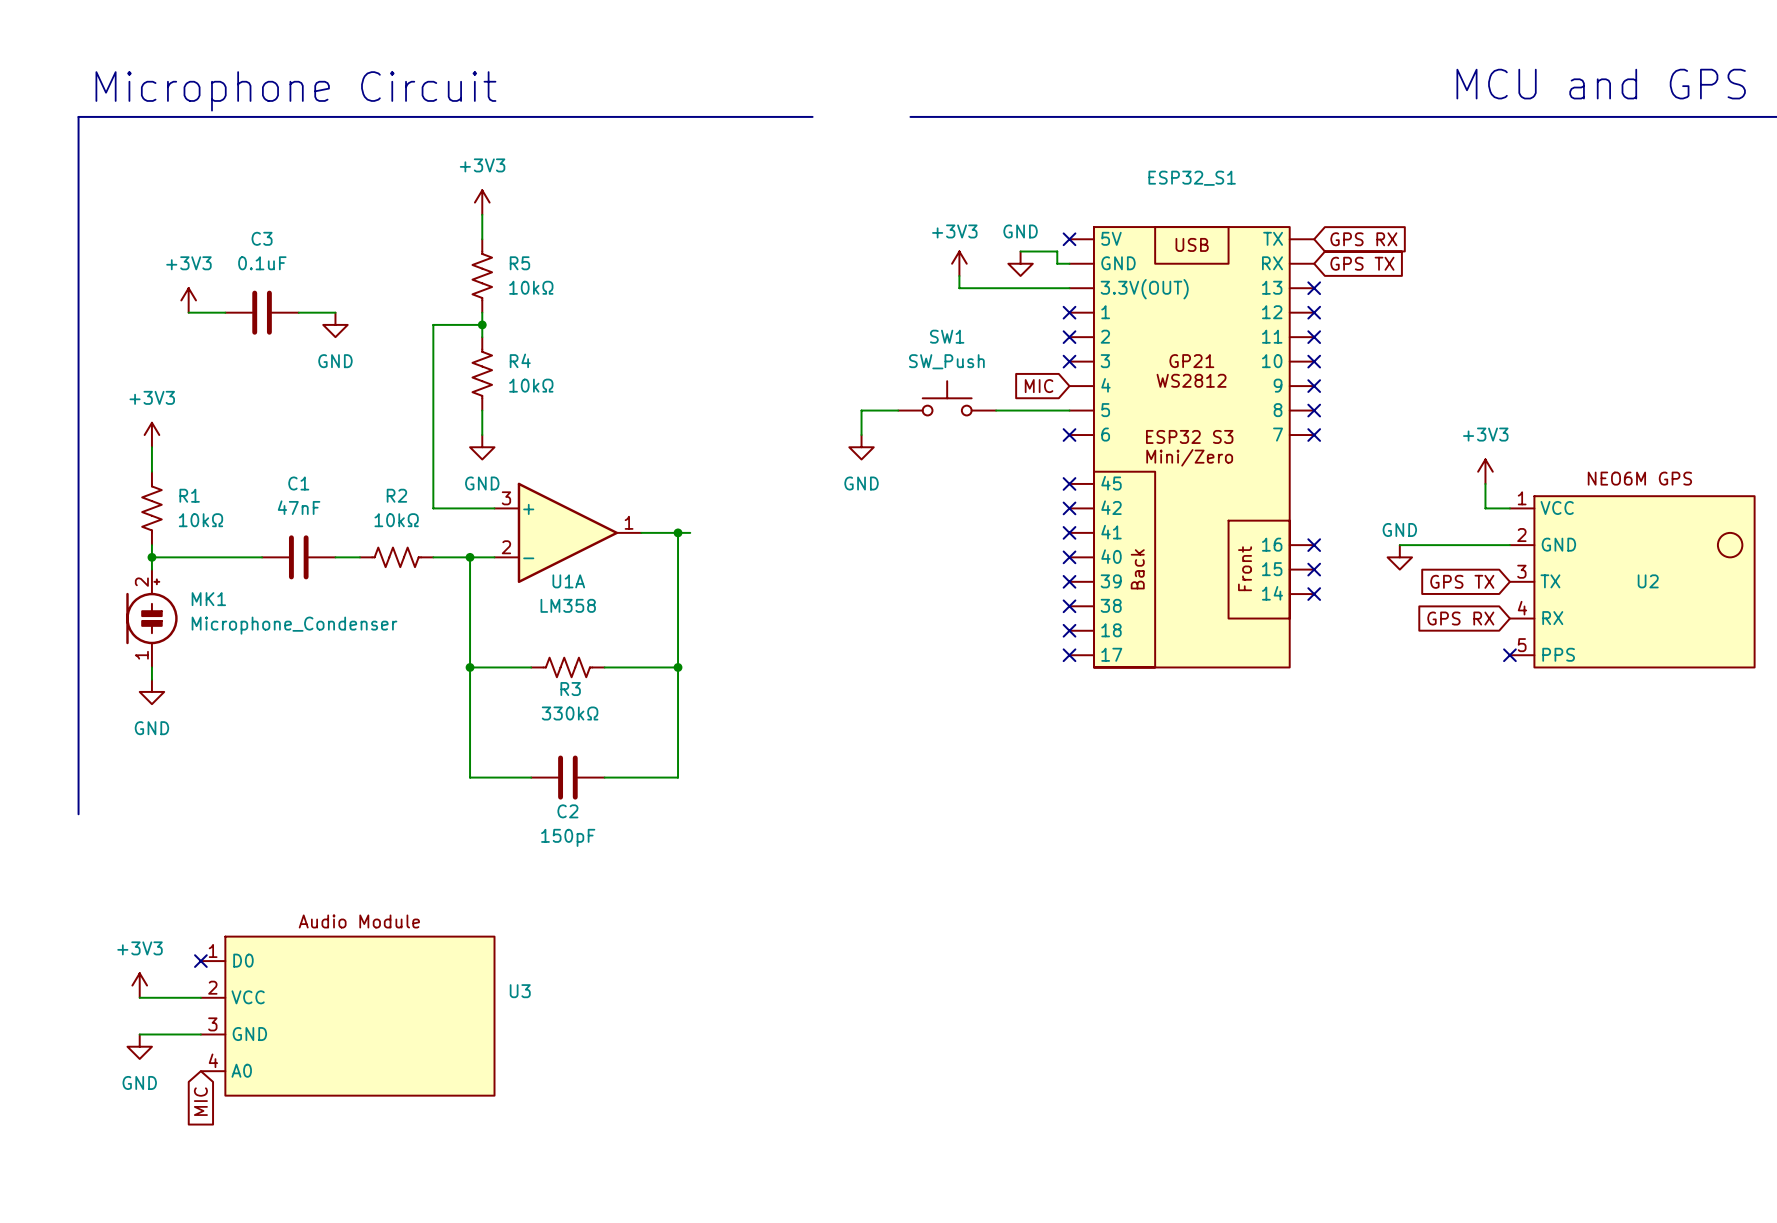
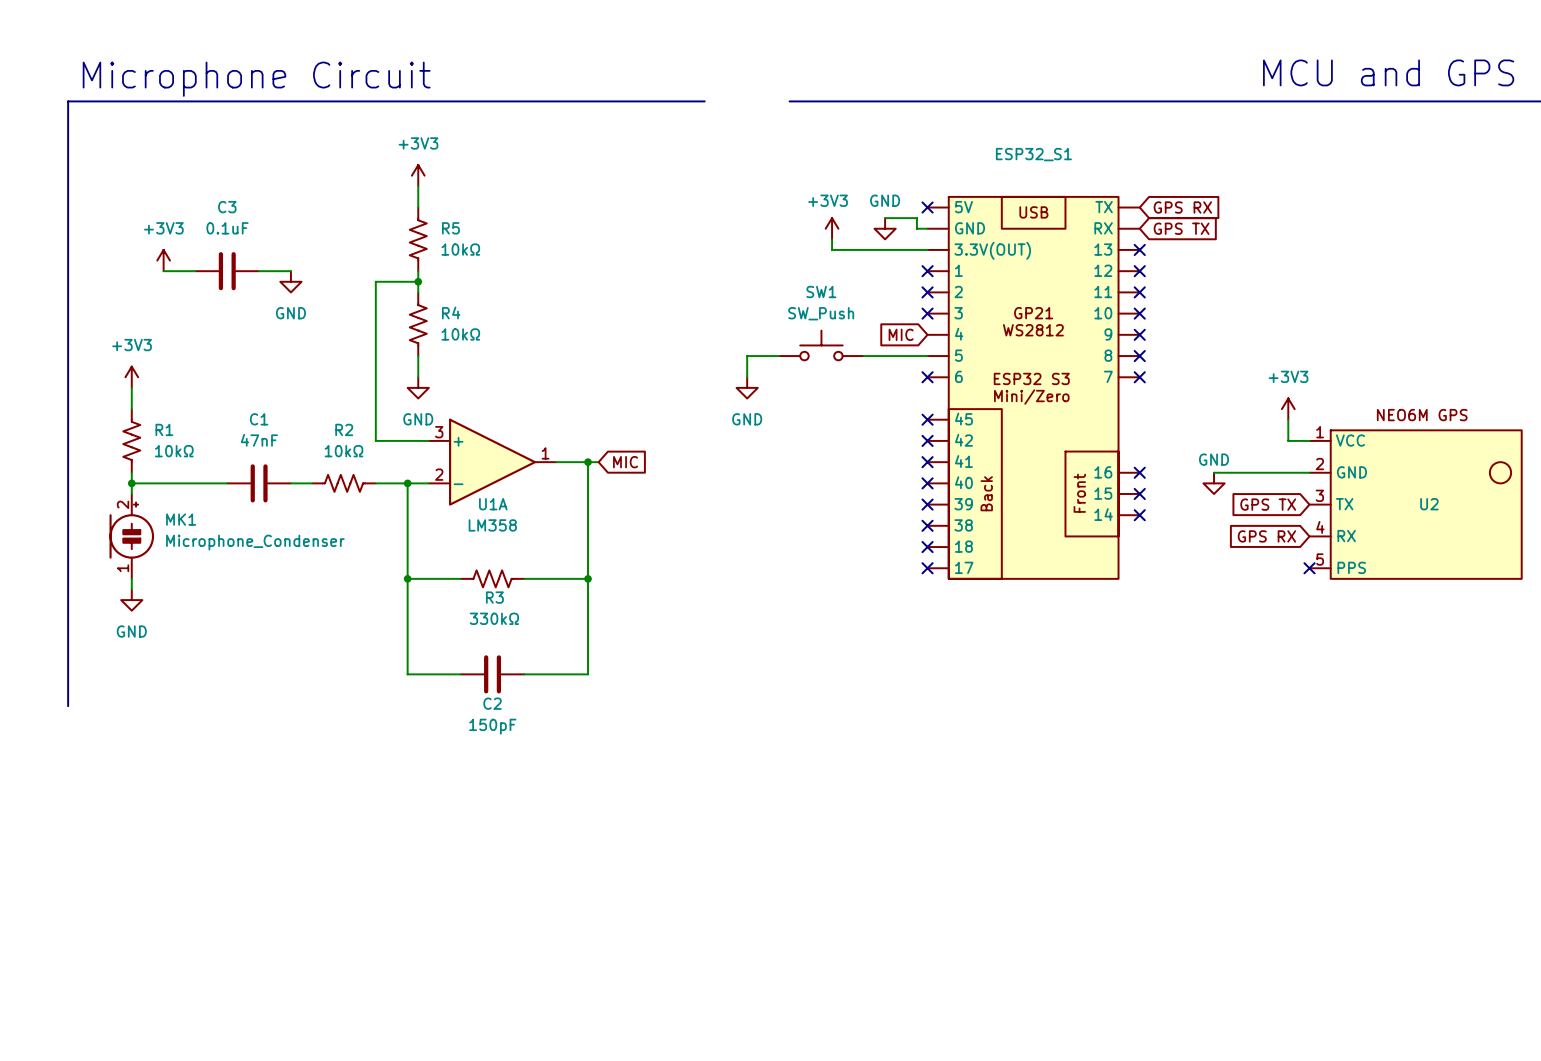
global label: none -> MIC (625, 462)
no-connect mark: (200, 961) -> none
power symbol: +3V3 (139, 985) -> none
wire: (139, 997) (200, 997) -> none
U3: (347, 1016) -> none
wire: (139, 1034) (200, 1034) -> none
power symbol: GND (139, 1046) -> none
global label: MIC (200, 1101) -> none

